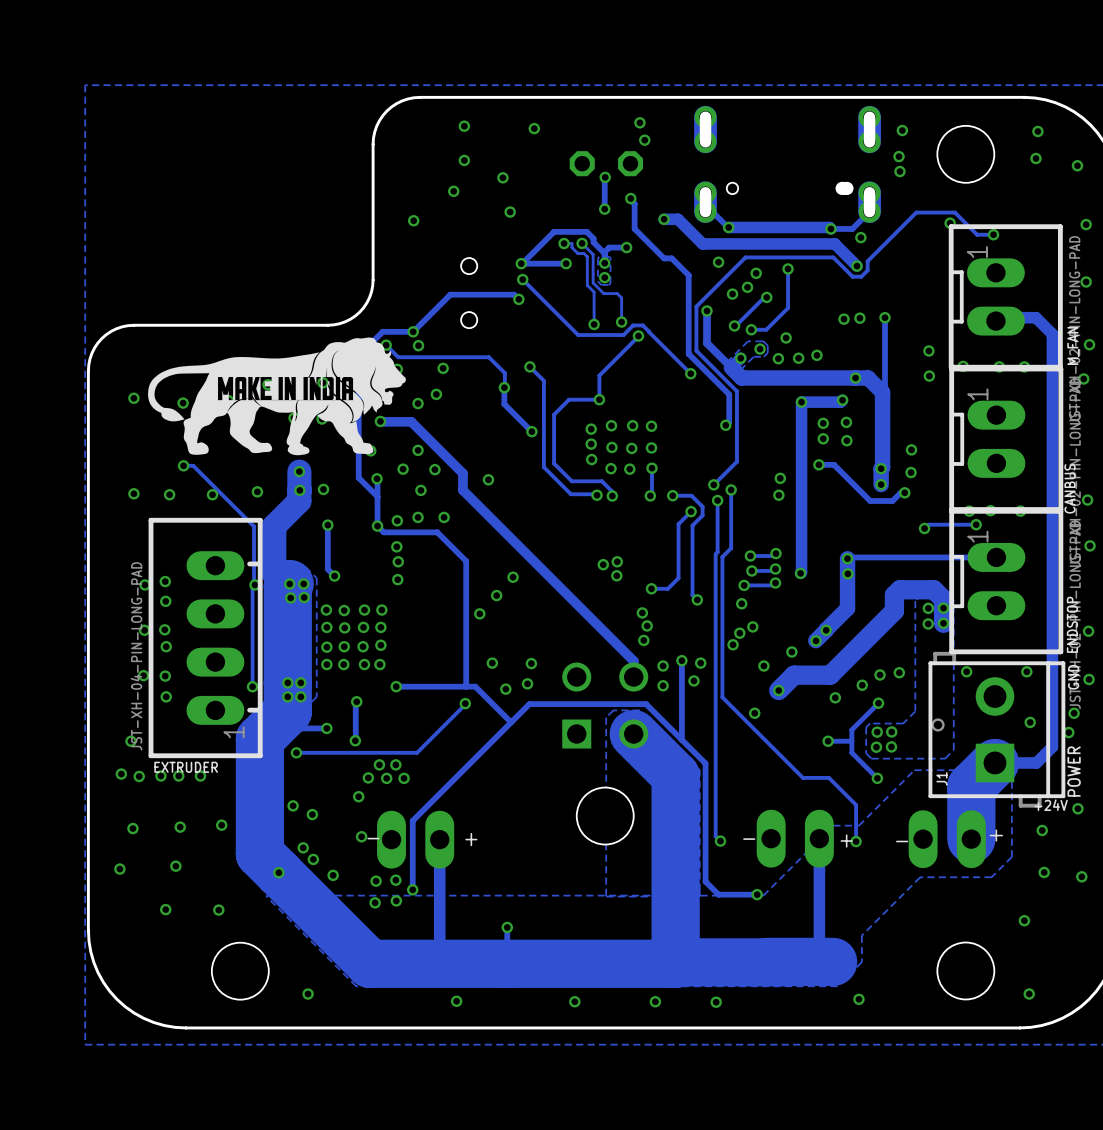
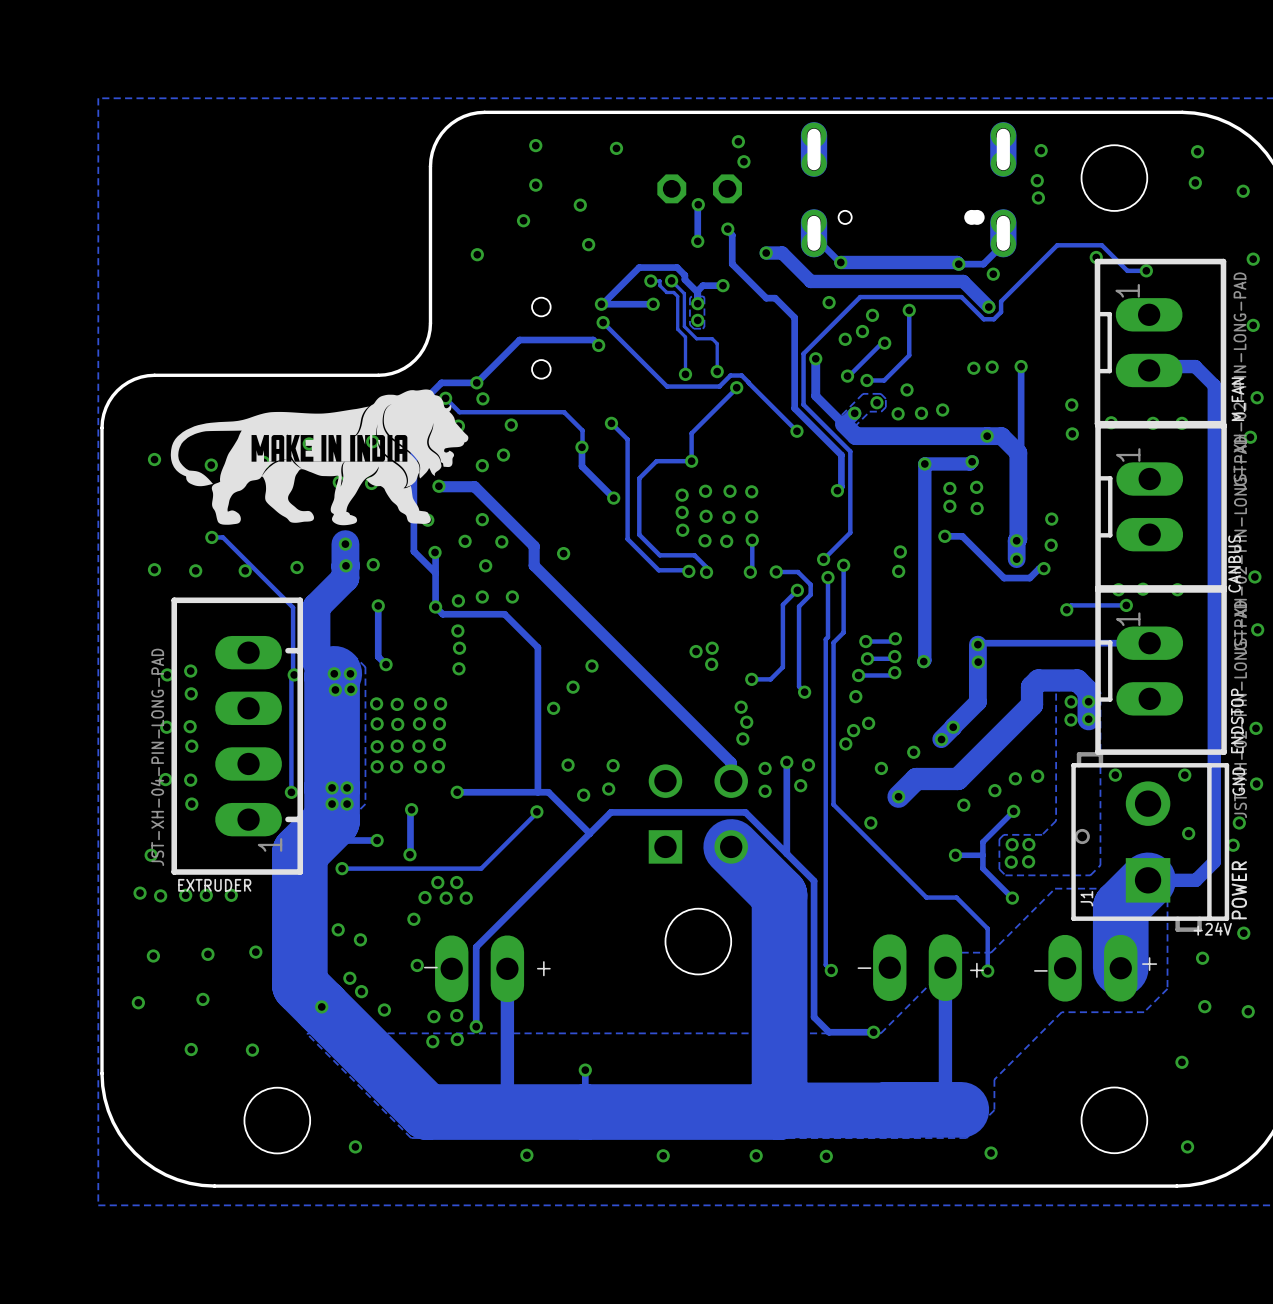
zone outline: (639, 710) (699, 770) (699, 896) (606, 896) (606, 717) (613, 710) (639, 710) -> none

